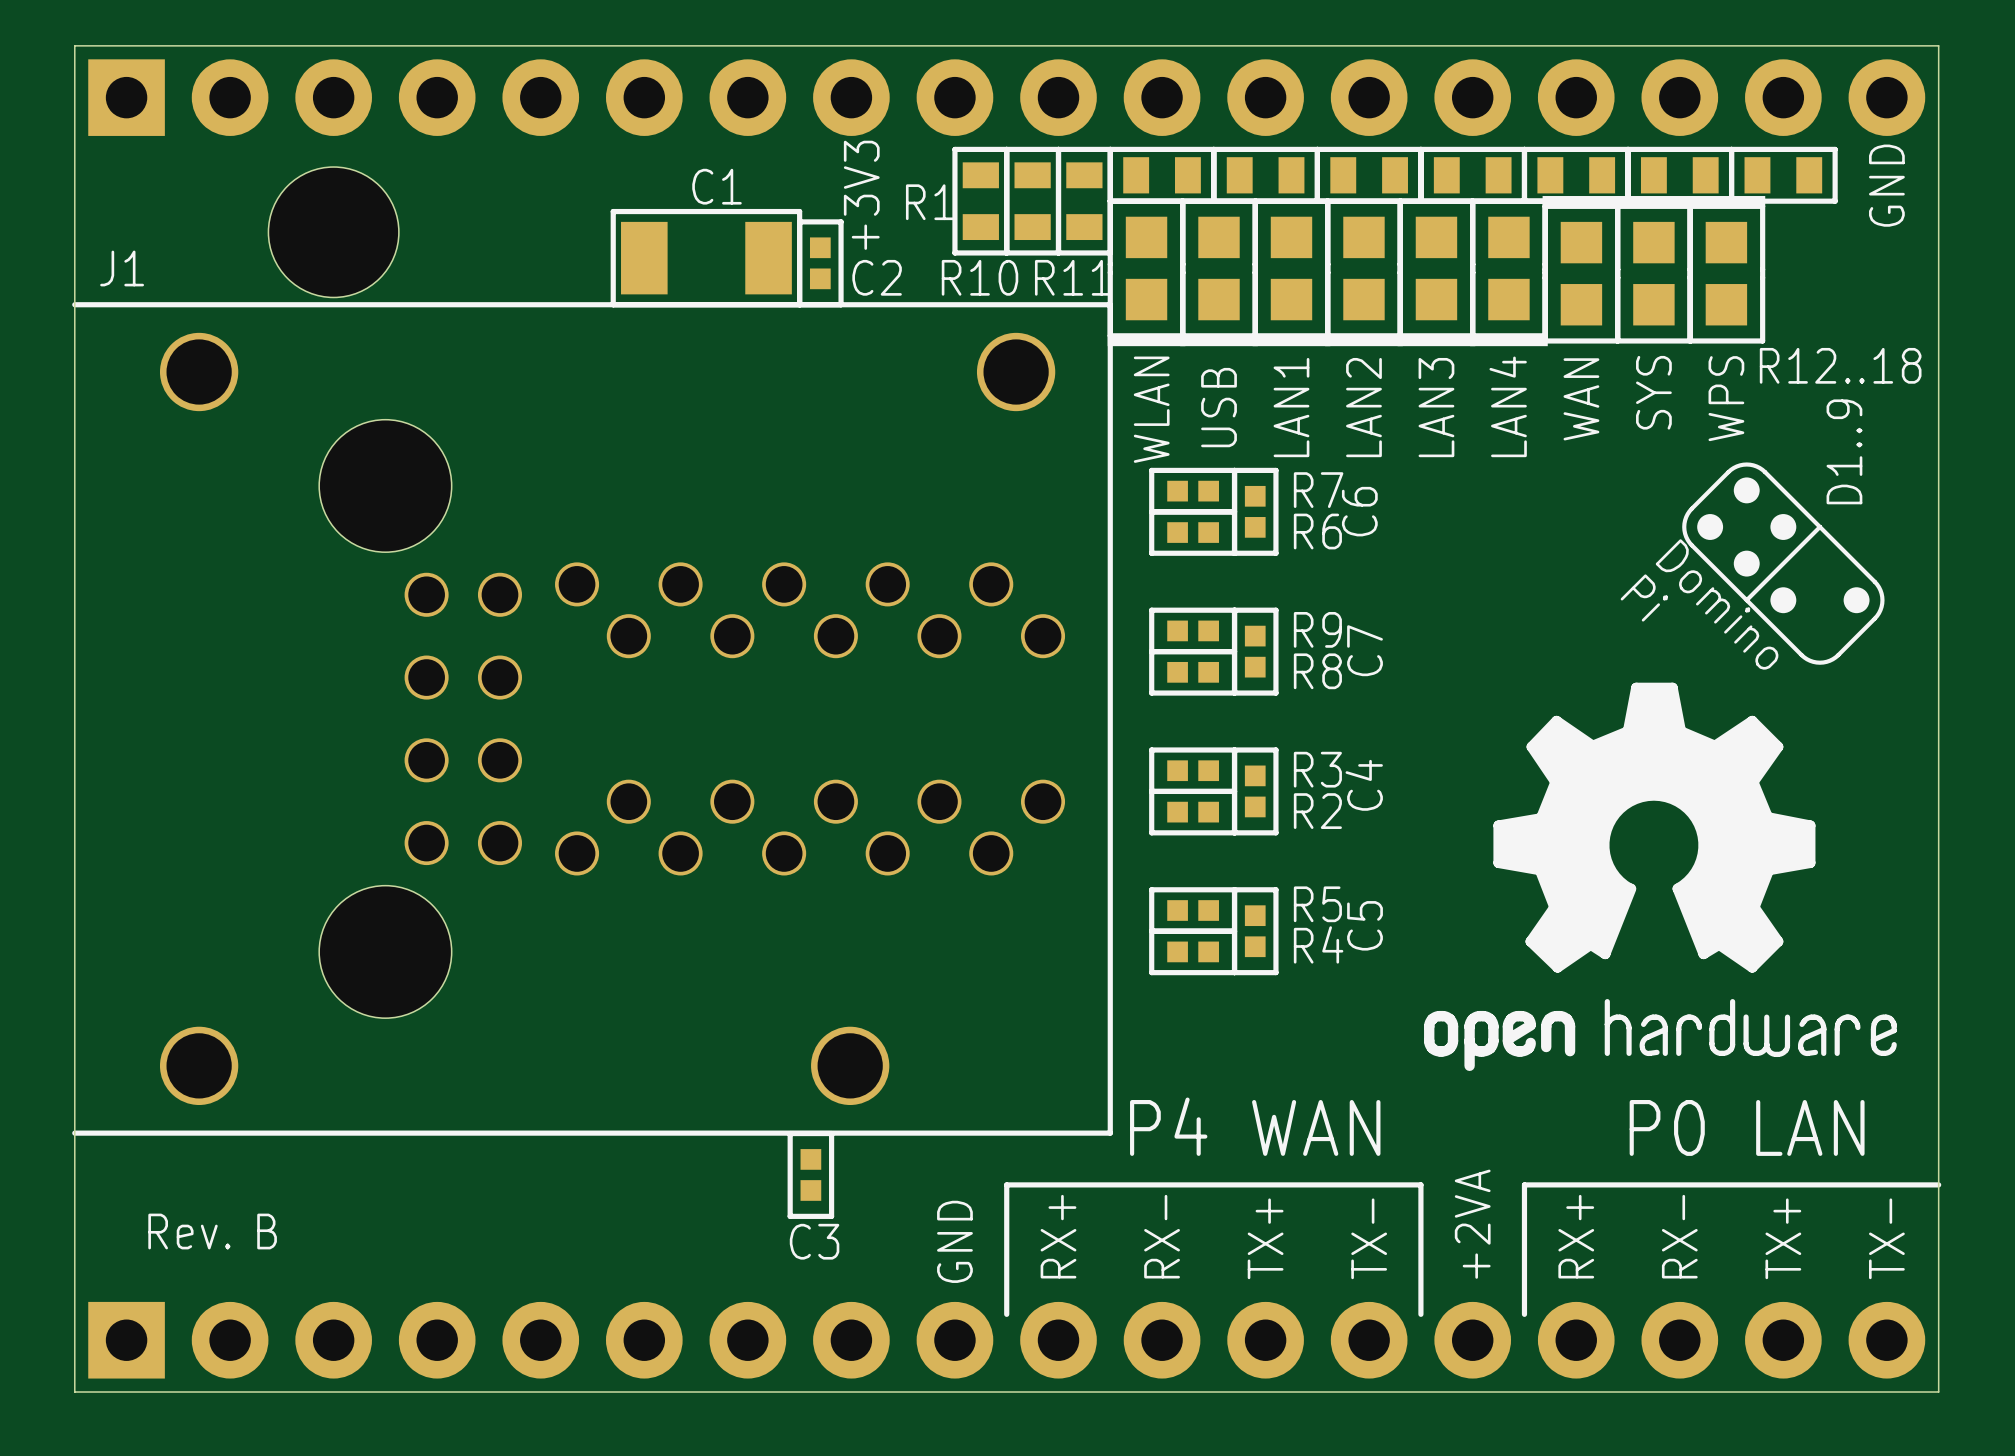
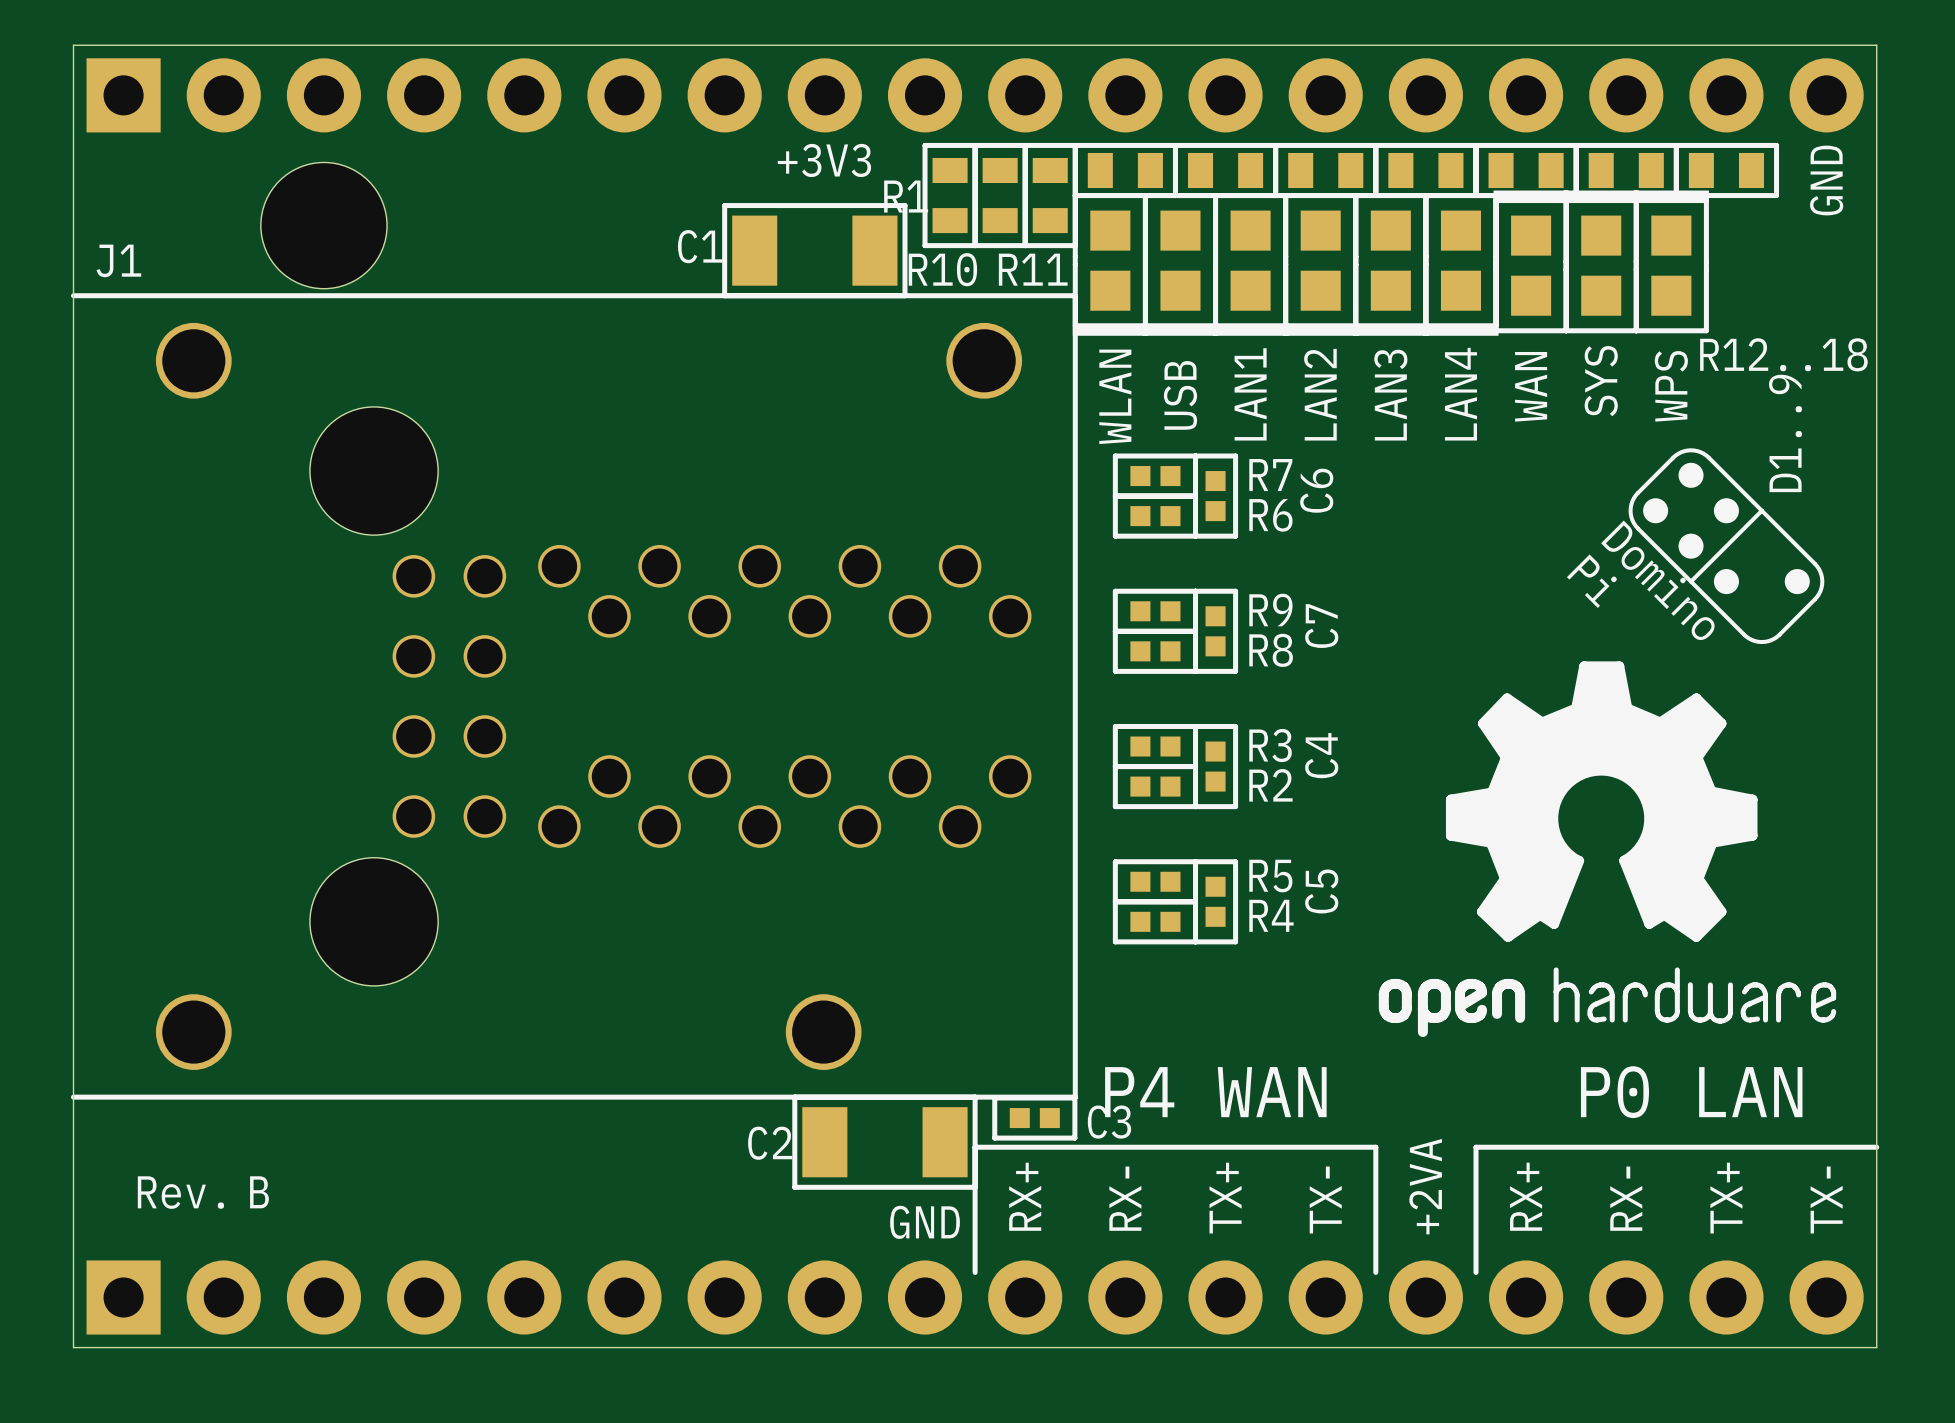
C1 name position: C1 (717, 186) -> C1 (700, 246)
text rotation: 0° (861, 195) -> 90° clockwise (824, 160)
C2 footprint: [797, 219, 844, 308] -> [792, 1094, 978, 1190]
C1 position: (706, 258) -> (814, 250)
C2 name position: C2 (877, 277) -> C2 (770, 1143)
C3 rotation: 0° (810, 1174) -> 90° clockwise (1034, 1118)
C3 position: (810, 1174) -> (1034, 1118)
C3 name position: C3 (814, 1241) -> C3 (1109, 1122)
text rotation: 0° (954, 1241) -> 90° clockwise (925, 1222)

